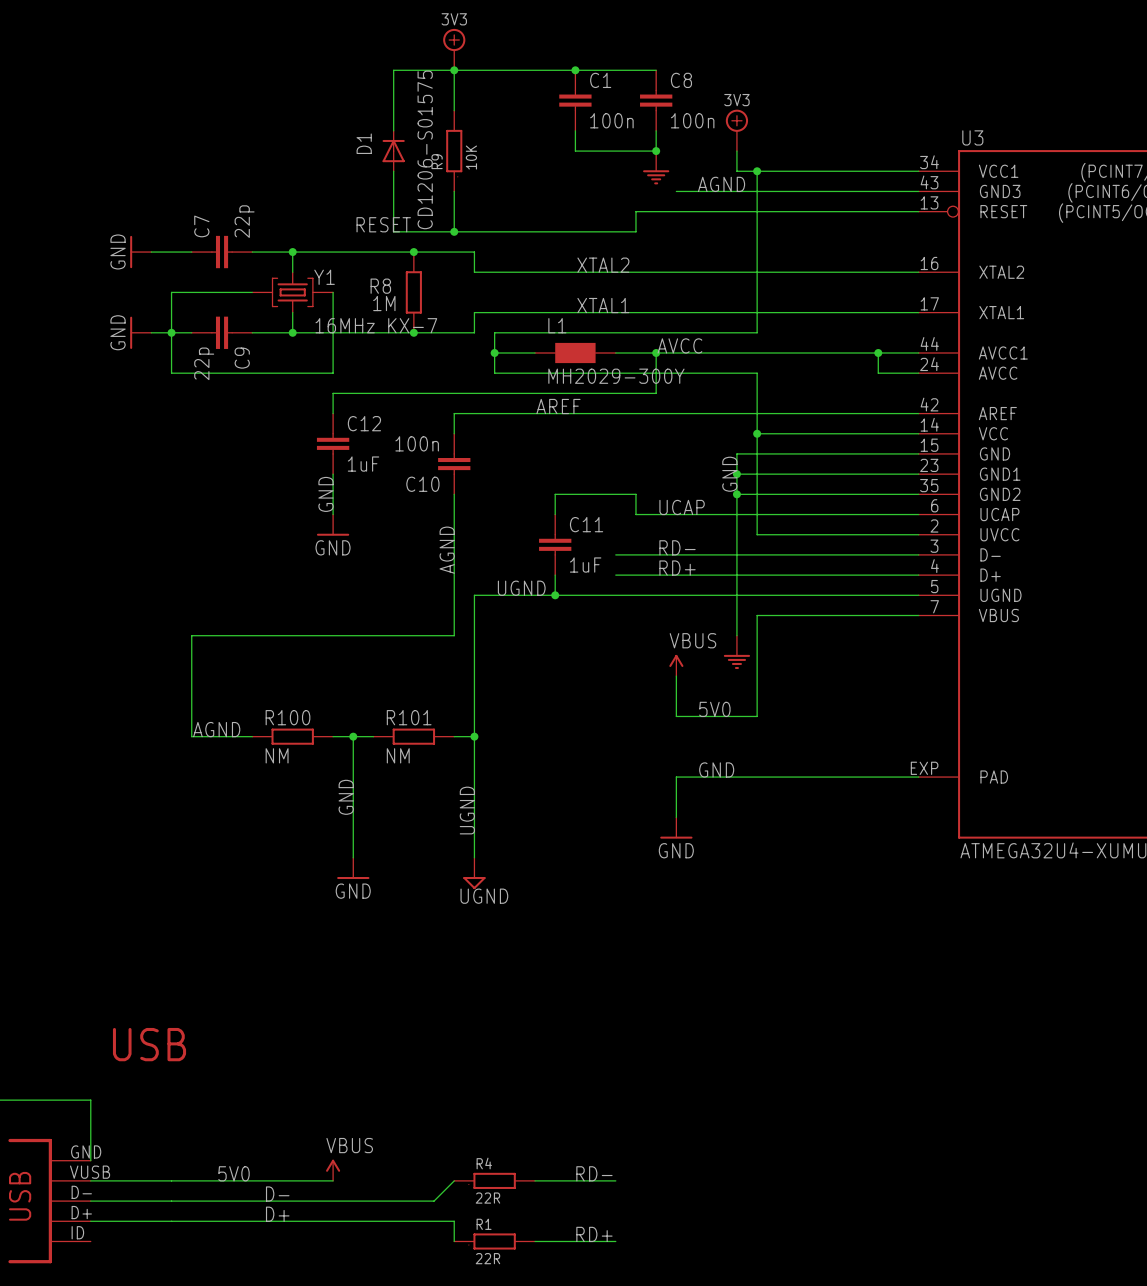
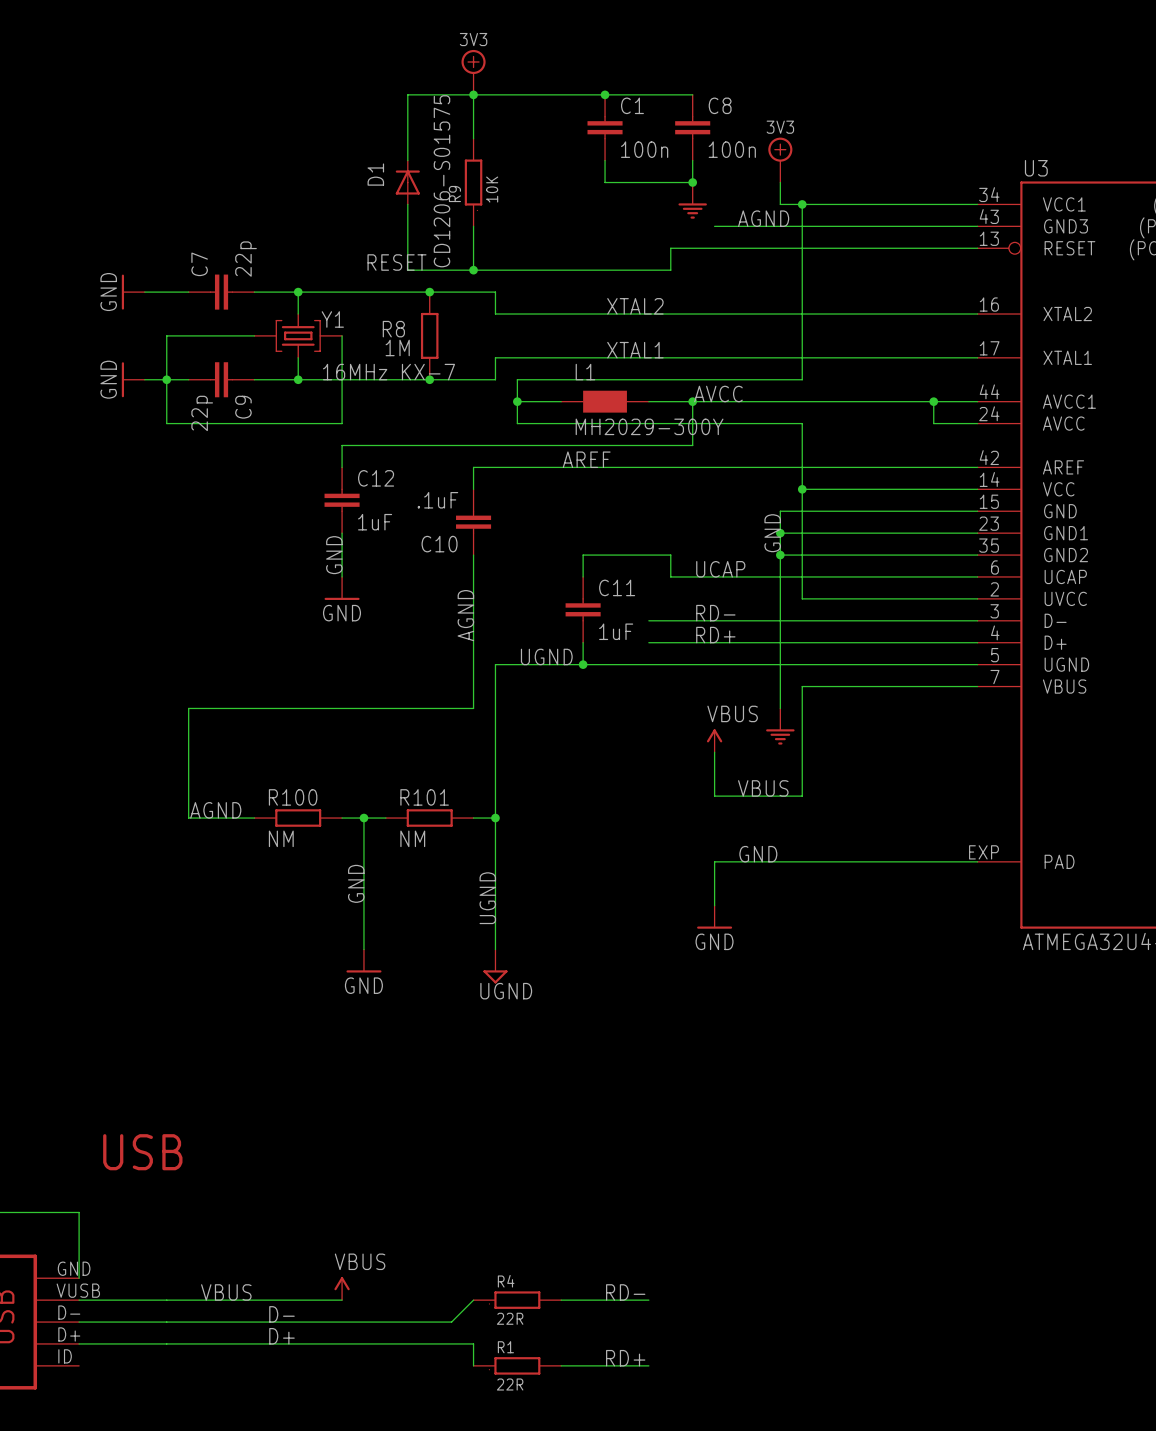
C10 value: 100n (417, 443) -> .1uF (437, 500)
label: 5V0 (714, 709) -> VBUS (763, 788)
label: 5V0 (234, 1173) -> VBUS (226, 1292)

